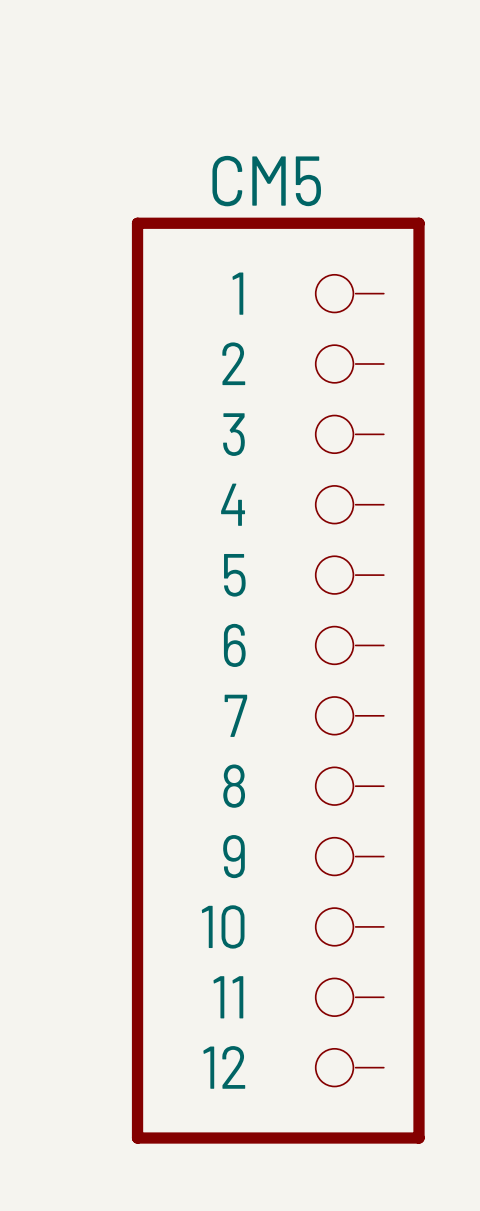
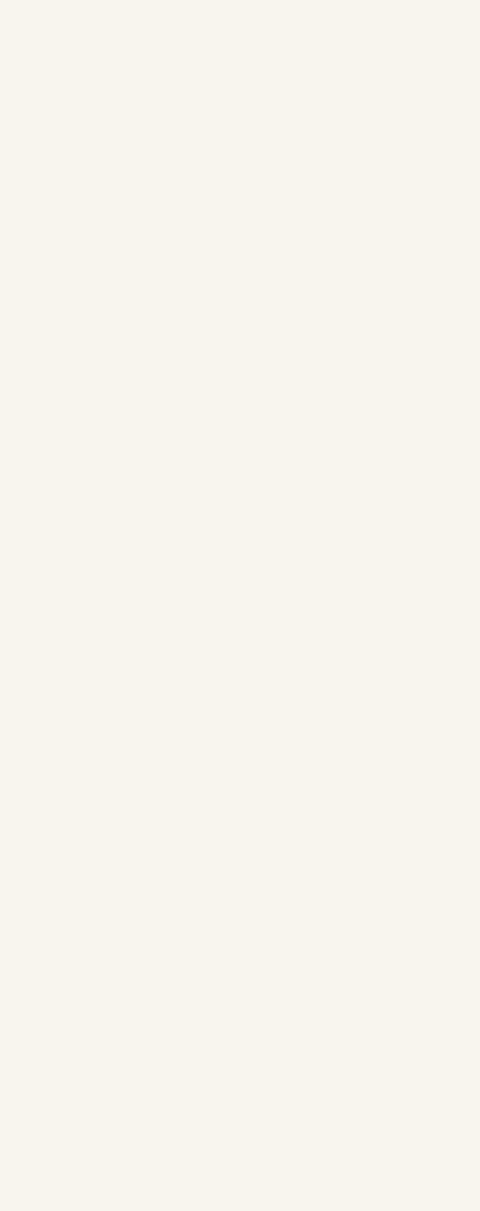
CM5: (278, 680) -> none

